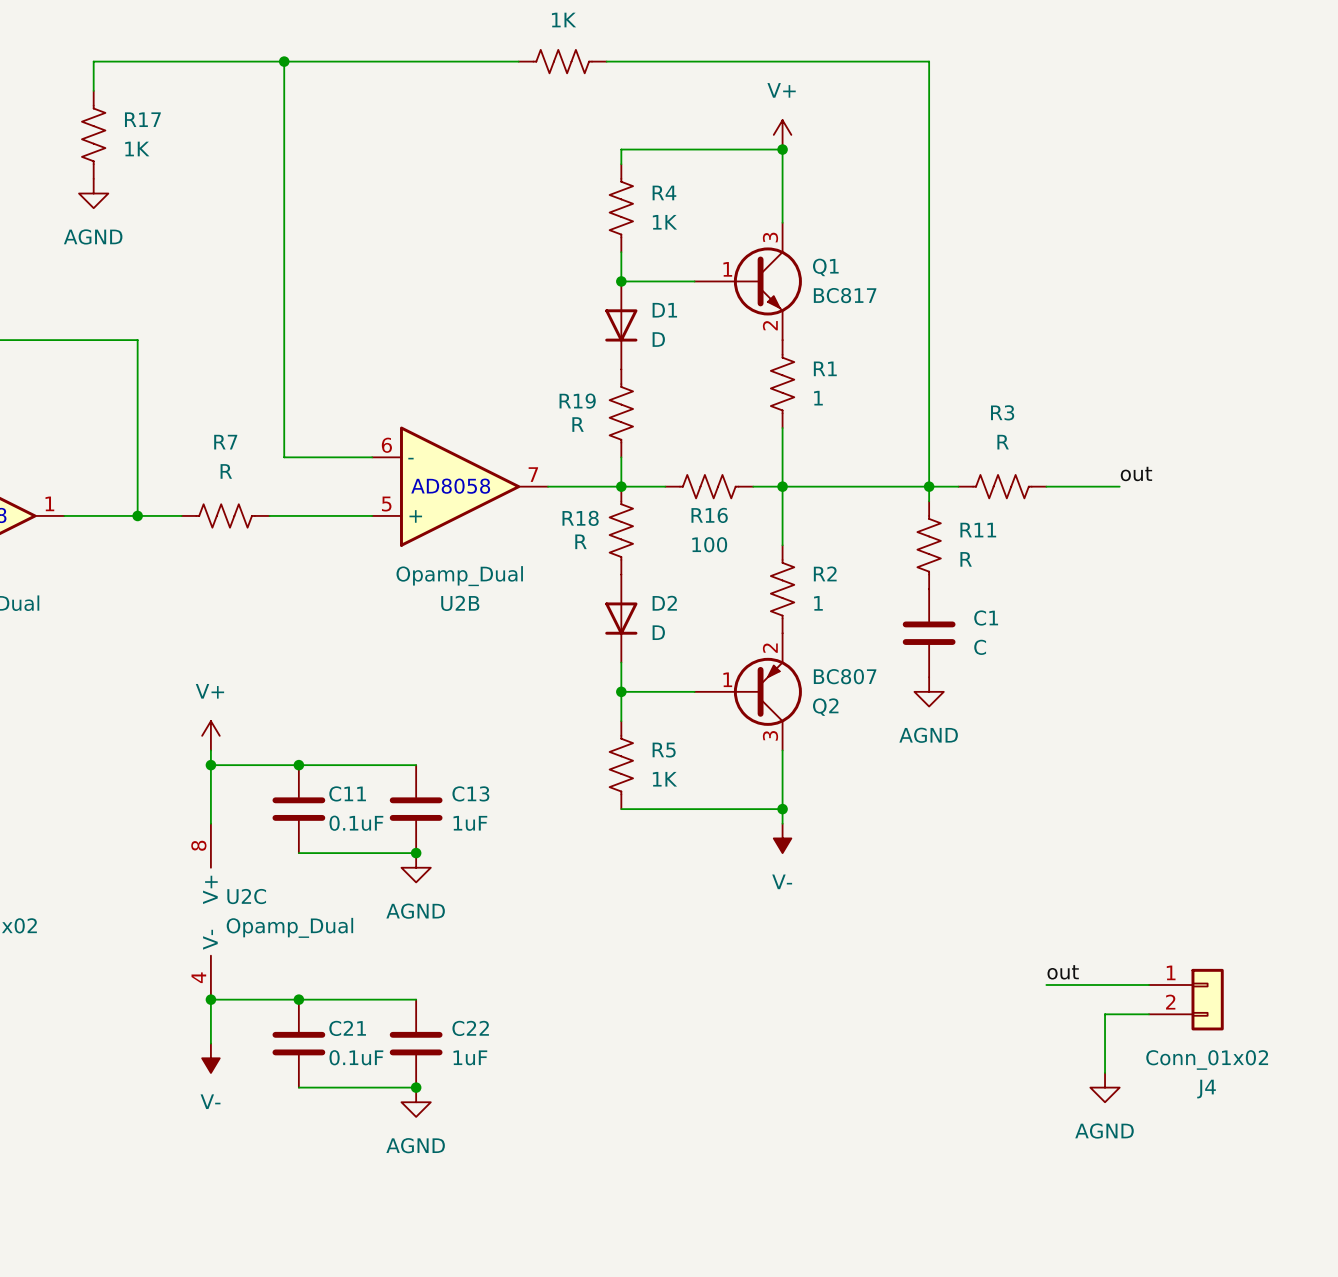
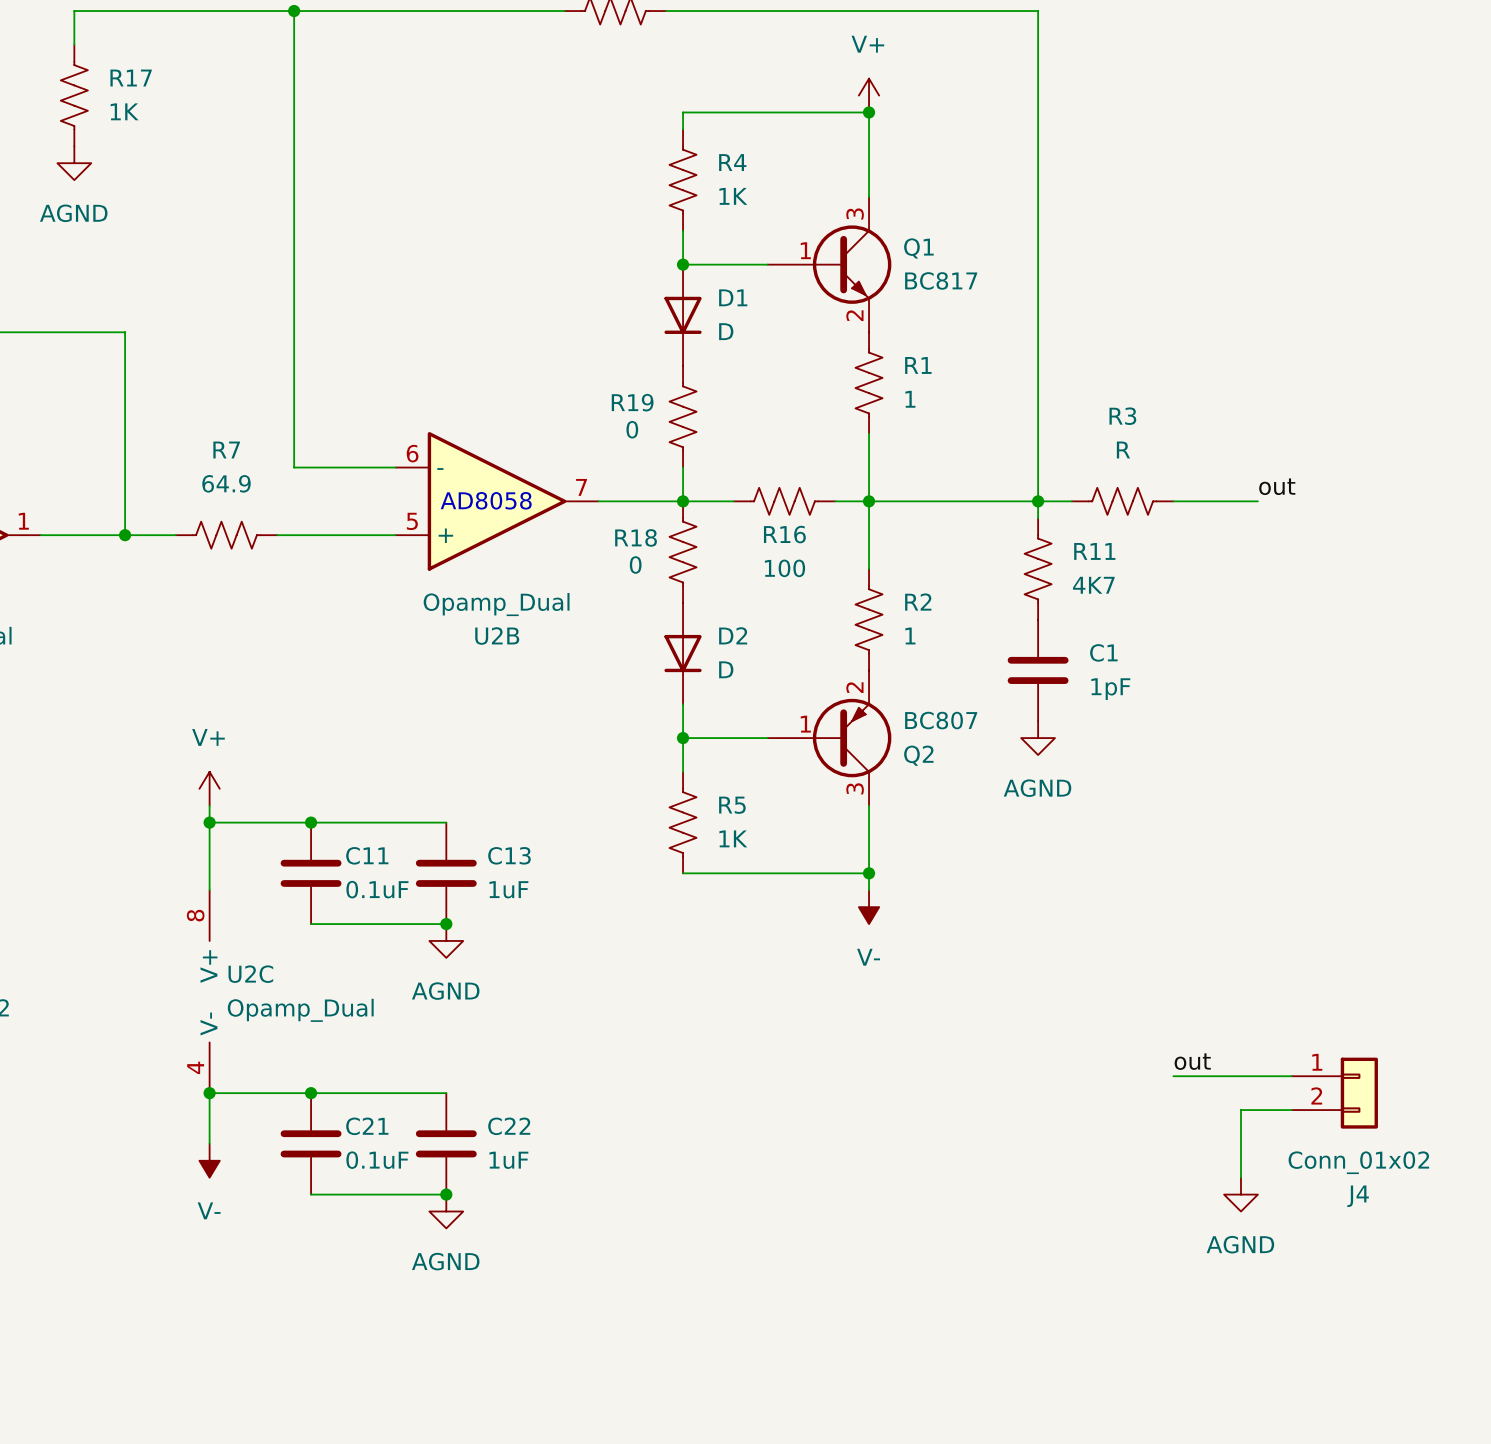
R19 value: R (578, 424) -> 0 (632, 429)
R7 value: R (226, 471) -> 64.9 (226, 483)
R18 value: R (580, 541) -> 0 (635, 564)
R11 value: R (966, 559) -> 4K7 (1093, 585)
C1 value: C (980, 647) -> 1pF (1110, 689)

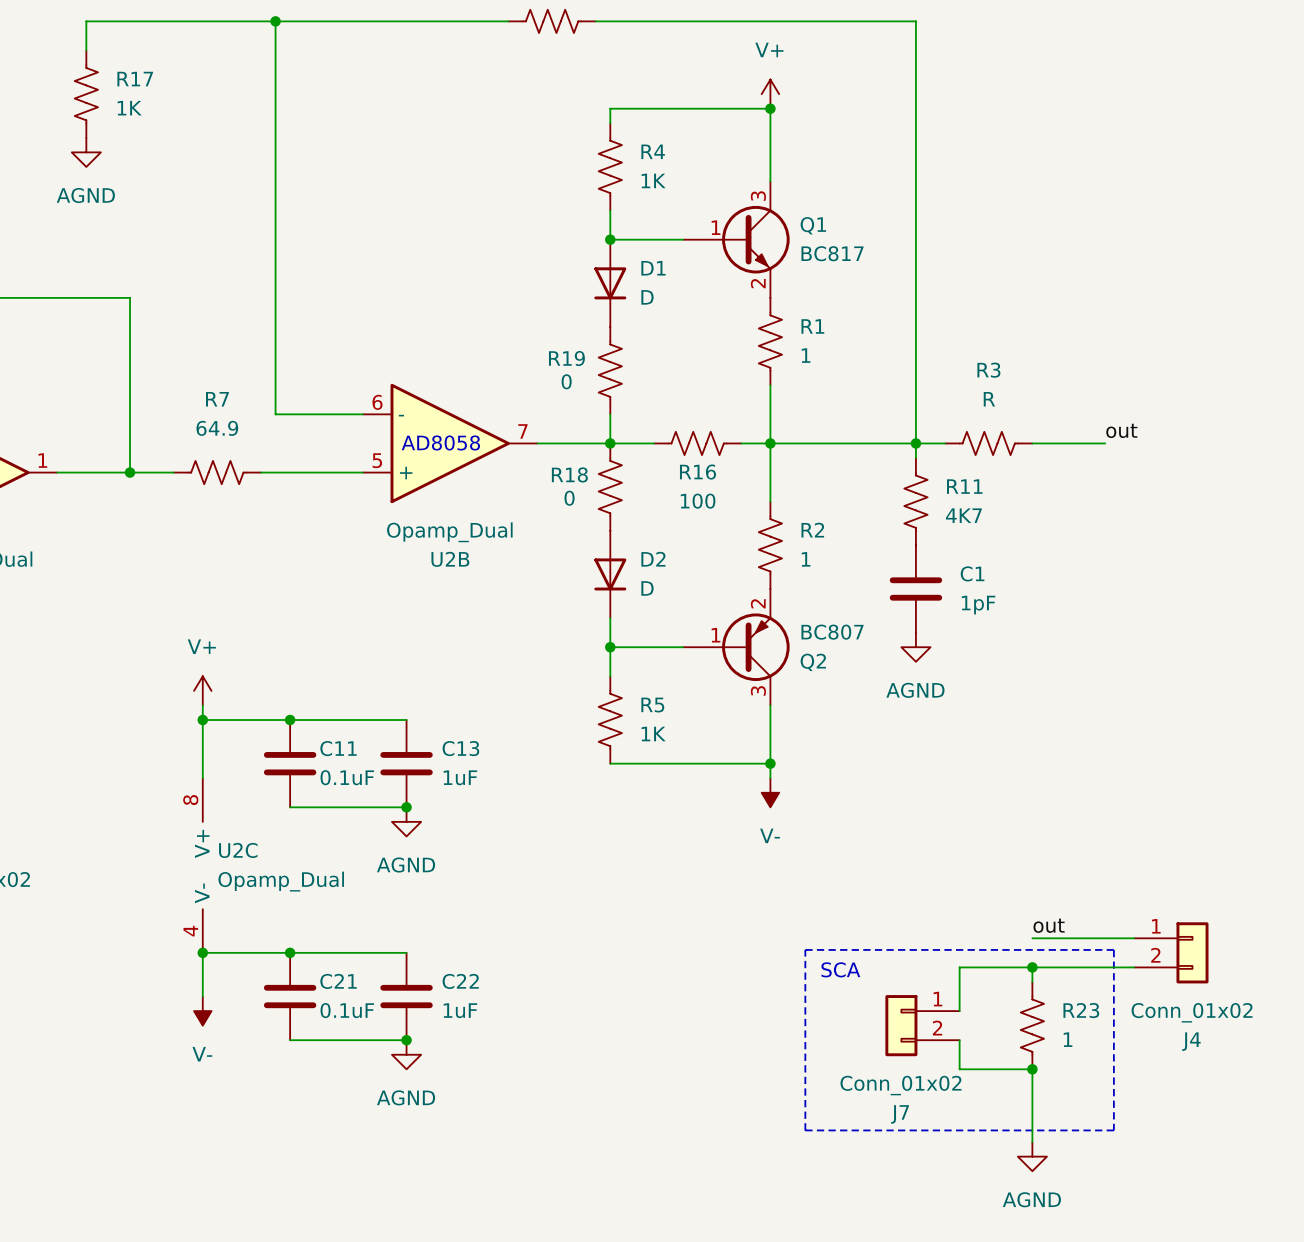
line: none -> (805, 949) (1113, 949) (1113, 1130) (805, 1130) (805, 949)
wire: none -> (1032, 967) (1032, 981)
junction: none -> (1032, 967)
wire: (1241, 1110) (1241, 1177) -> (1090, 967) (959, 967) (959, 1011)
text: none -> SCA (840, 969)
J7: none -> Conn_01x02 (922, 1025)
R23: none -> 1 (1032, 1025)
wire: none -> (959, 1040) (959, 1069) (1032, 1069) (1032, 1142)
power symbol position: AGND (1241, 1194) -> AGND (1032, 1156)
junction: none -> (1032, 1069)

